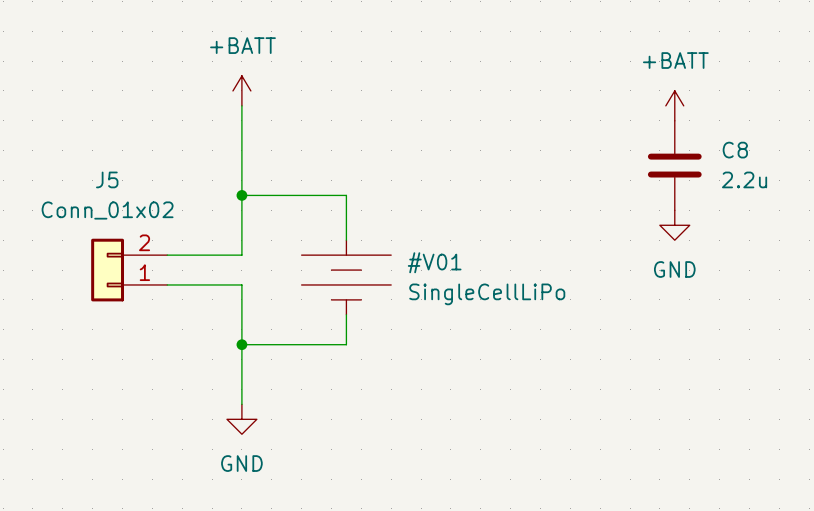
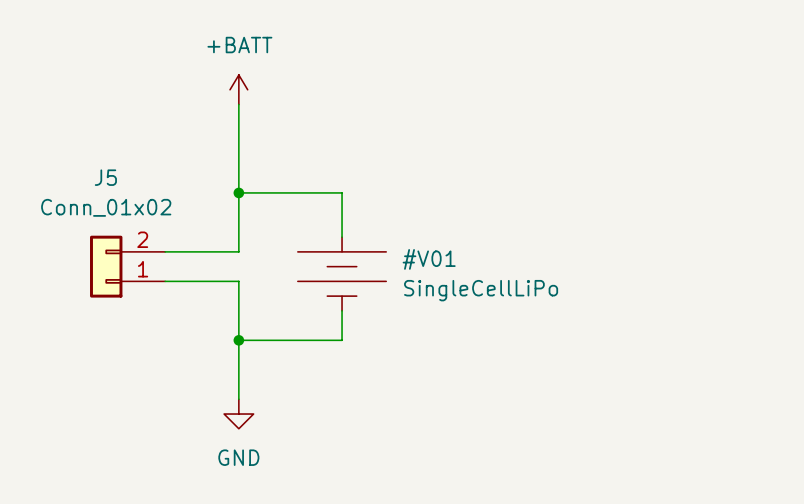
power symbol: +BATT (674, 105) -> none
C8: 2.2u (674, 165) -> none
power symbol: GND (674, 225) -> none

